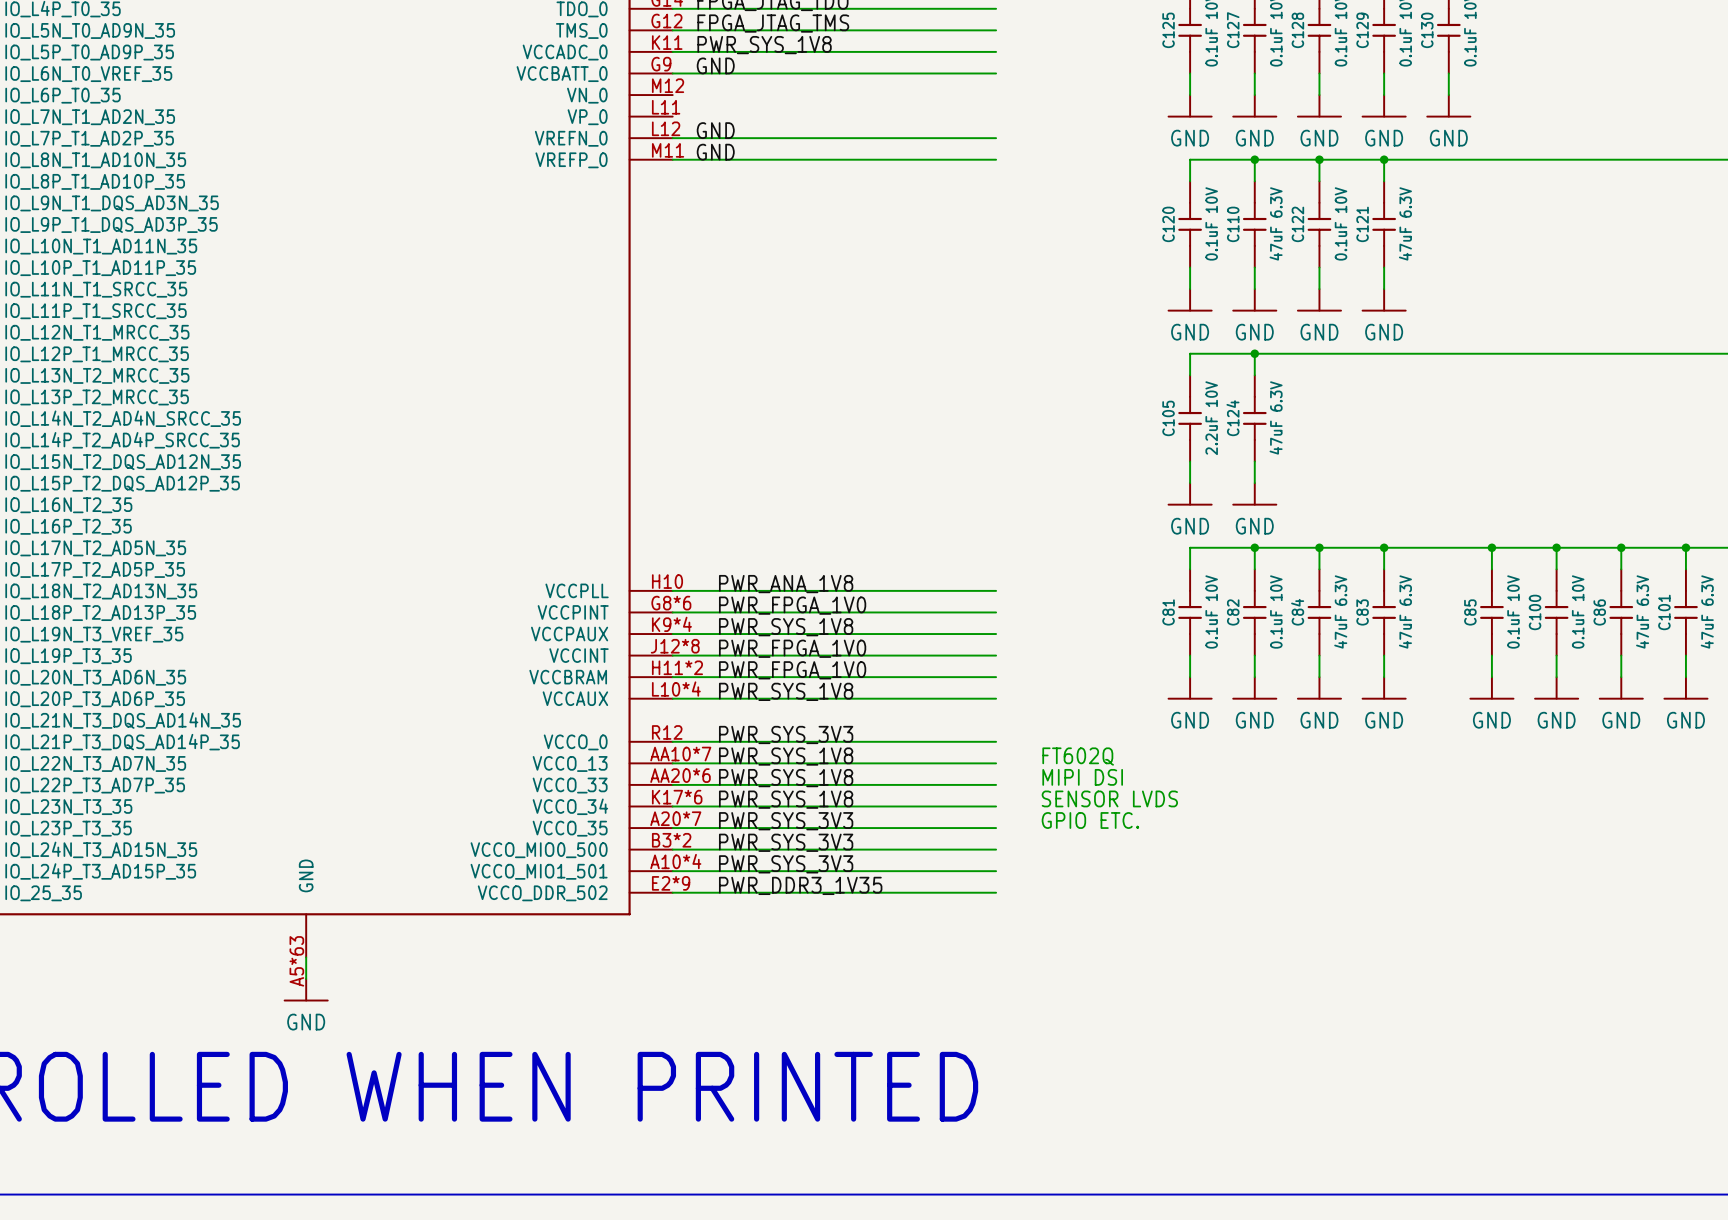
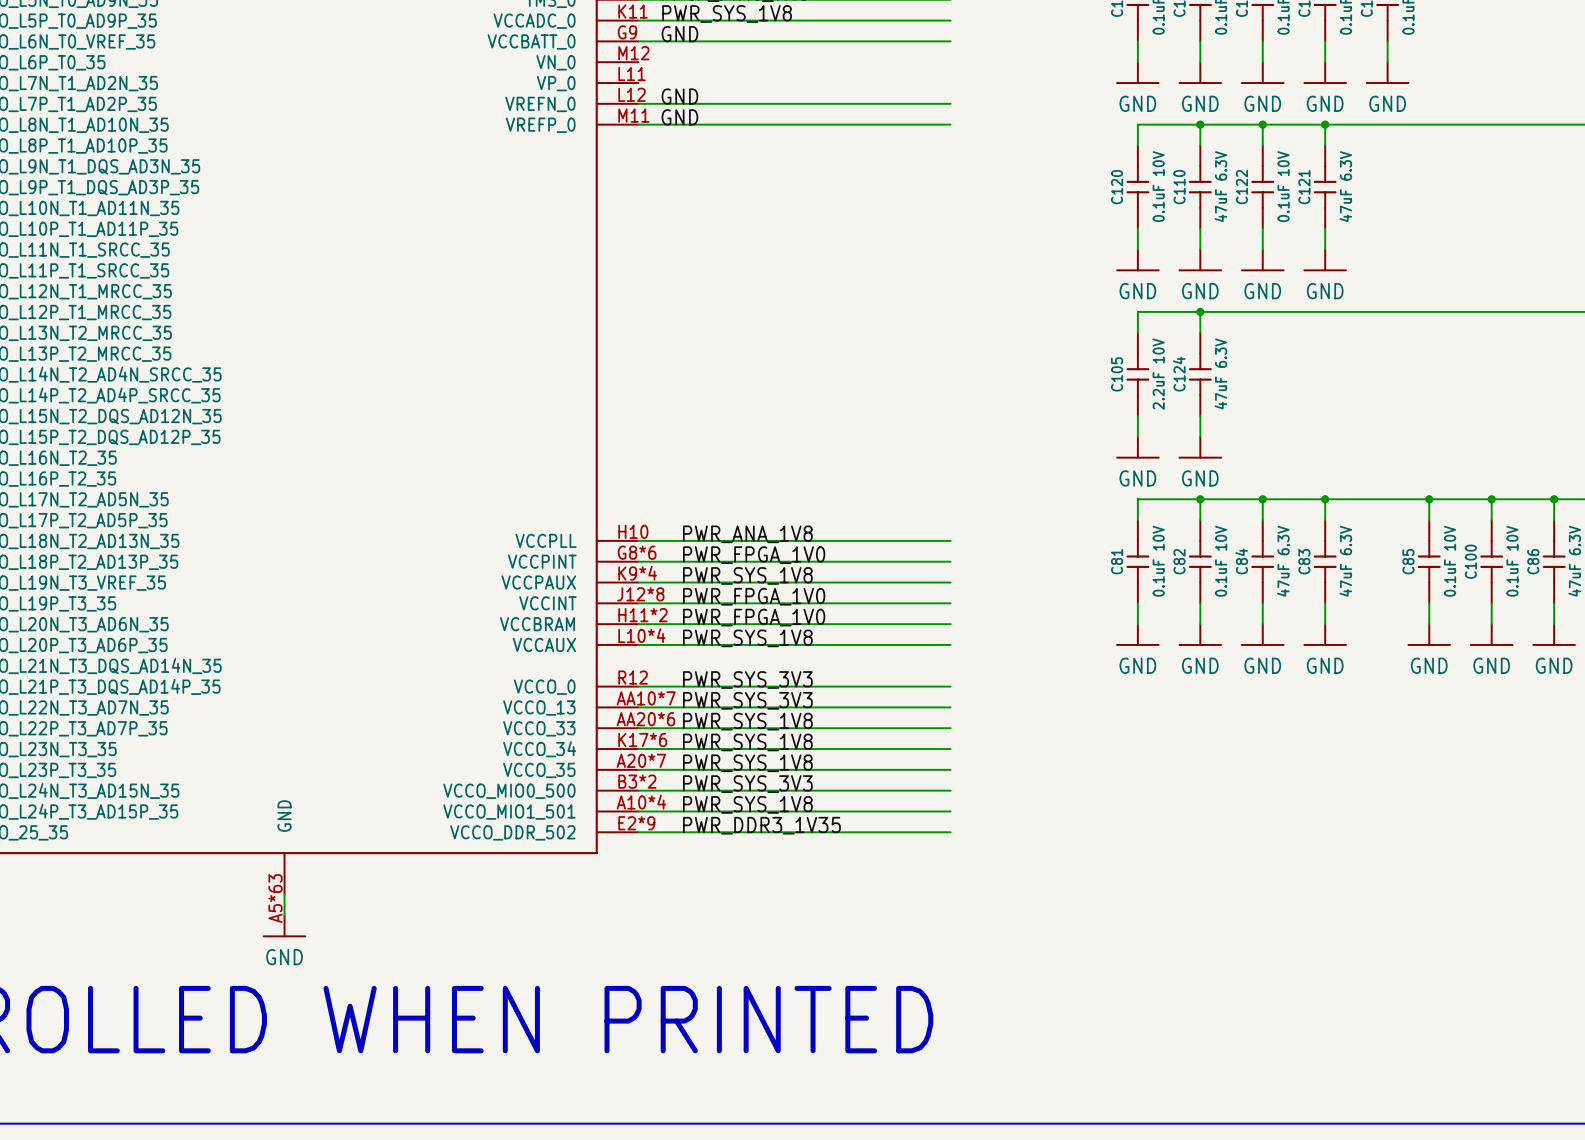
label: PWR_SYS_1V8 (786, 756) -> PWR_SYS_3V3 (747, 700)
text: FT602Q (1078, 756) -> none
text: MIPI DSI (1082, 777) -> none
text: SENSOR LVDS (1109, 798) -> none
text: GPIO ETC. (1090, 820) -> none
label: PWR_SYS_3V3 (786, 821) -> PWR_SYS_1V8 (747, 763)
label: PWR_SYS_3V3 (786, 864) -> PWR_SYS_1V8 (747, 804)

